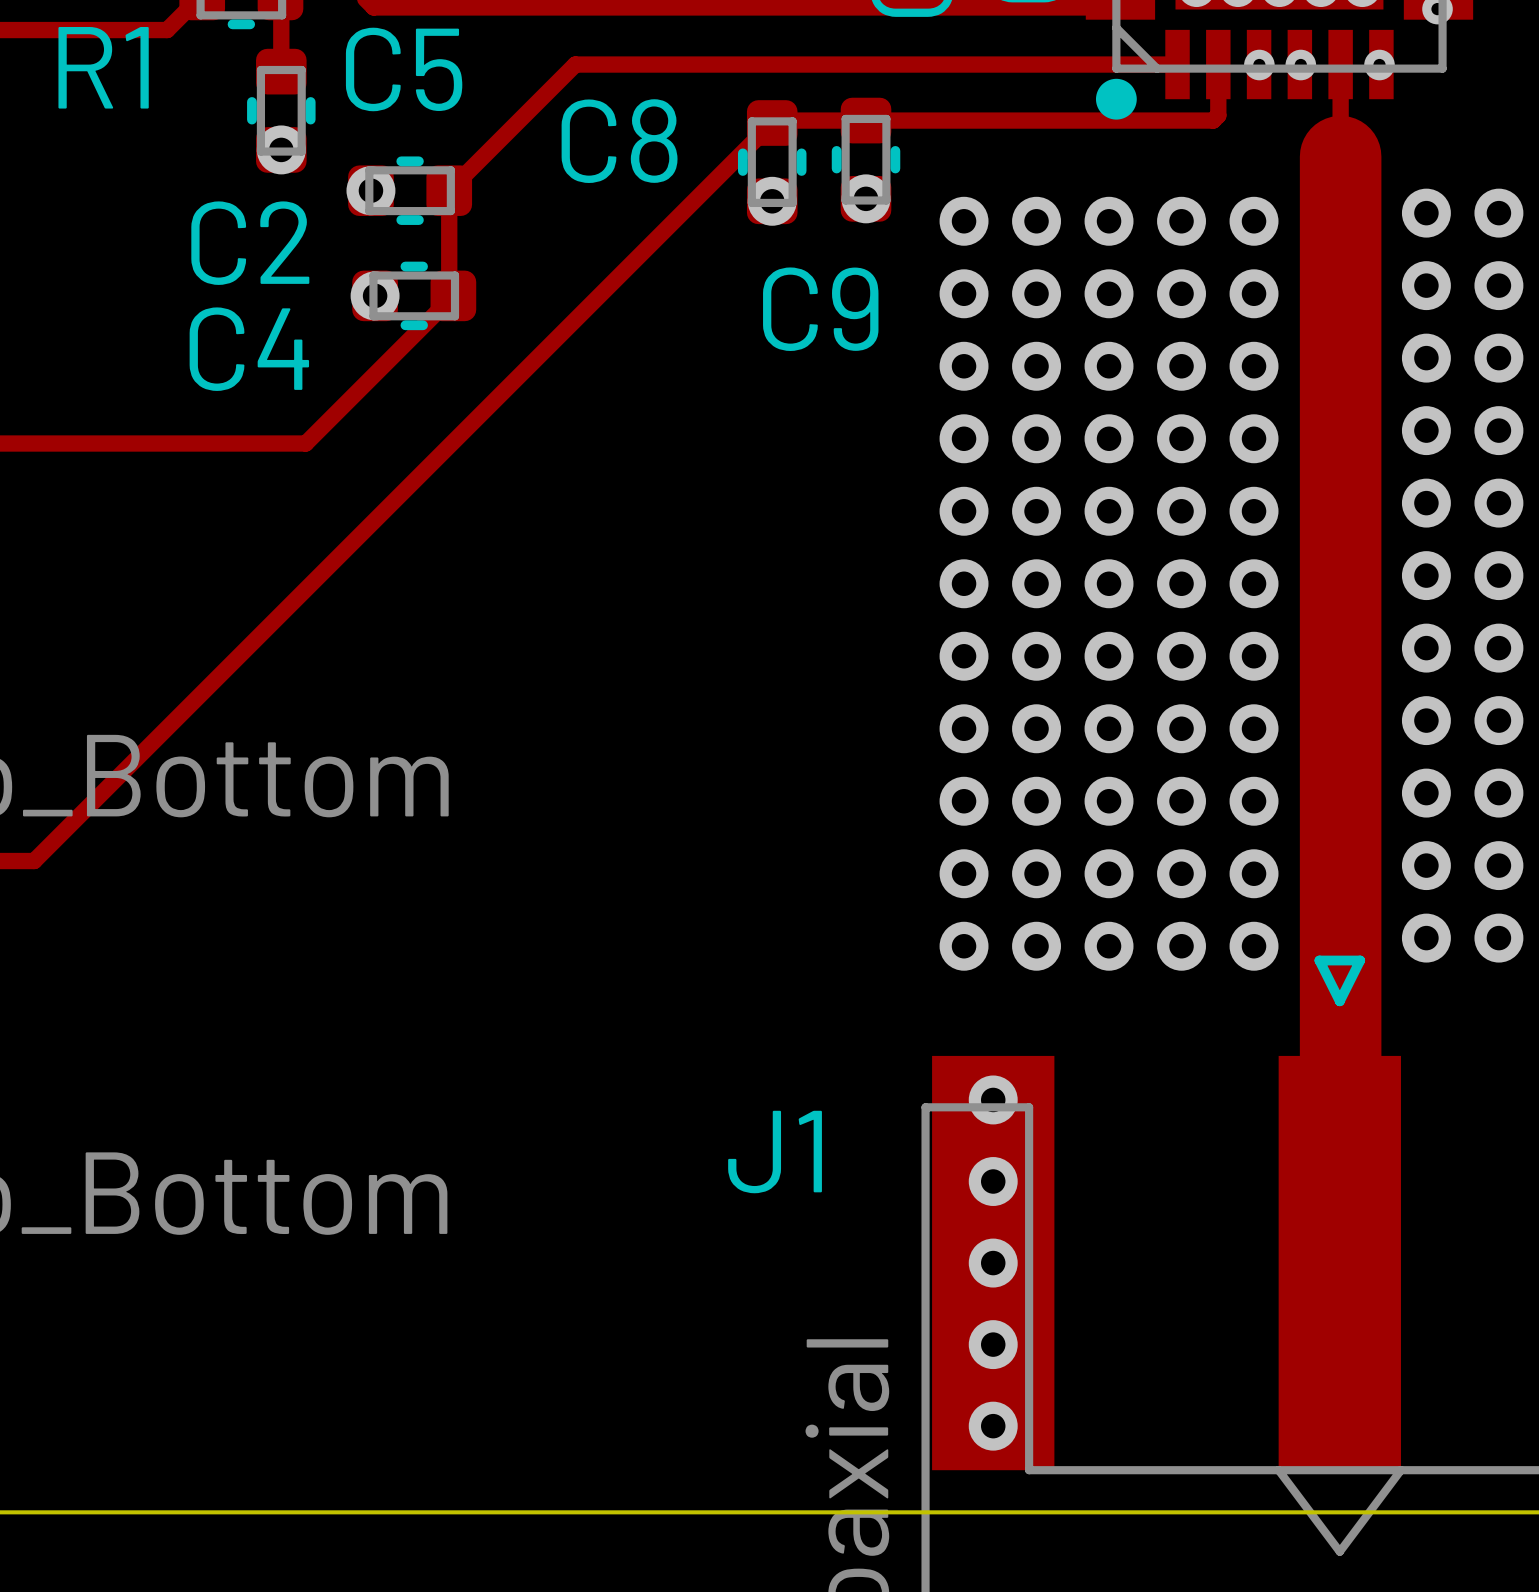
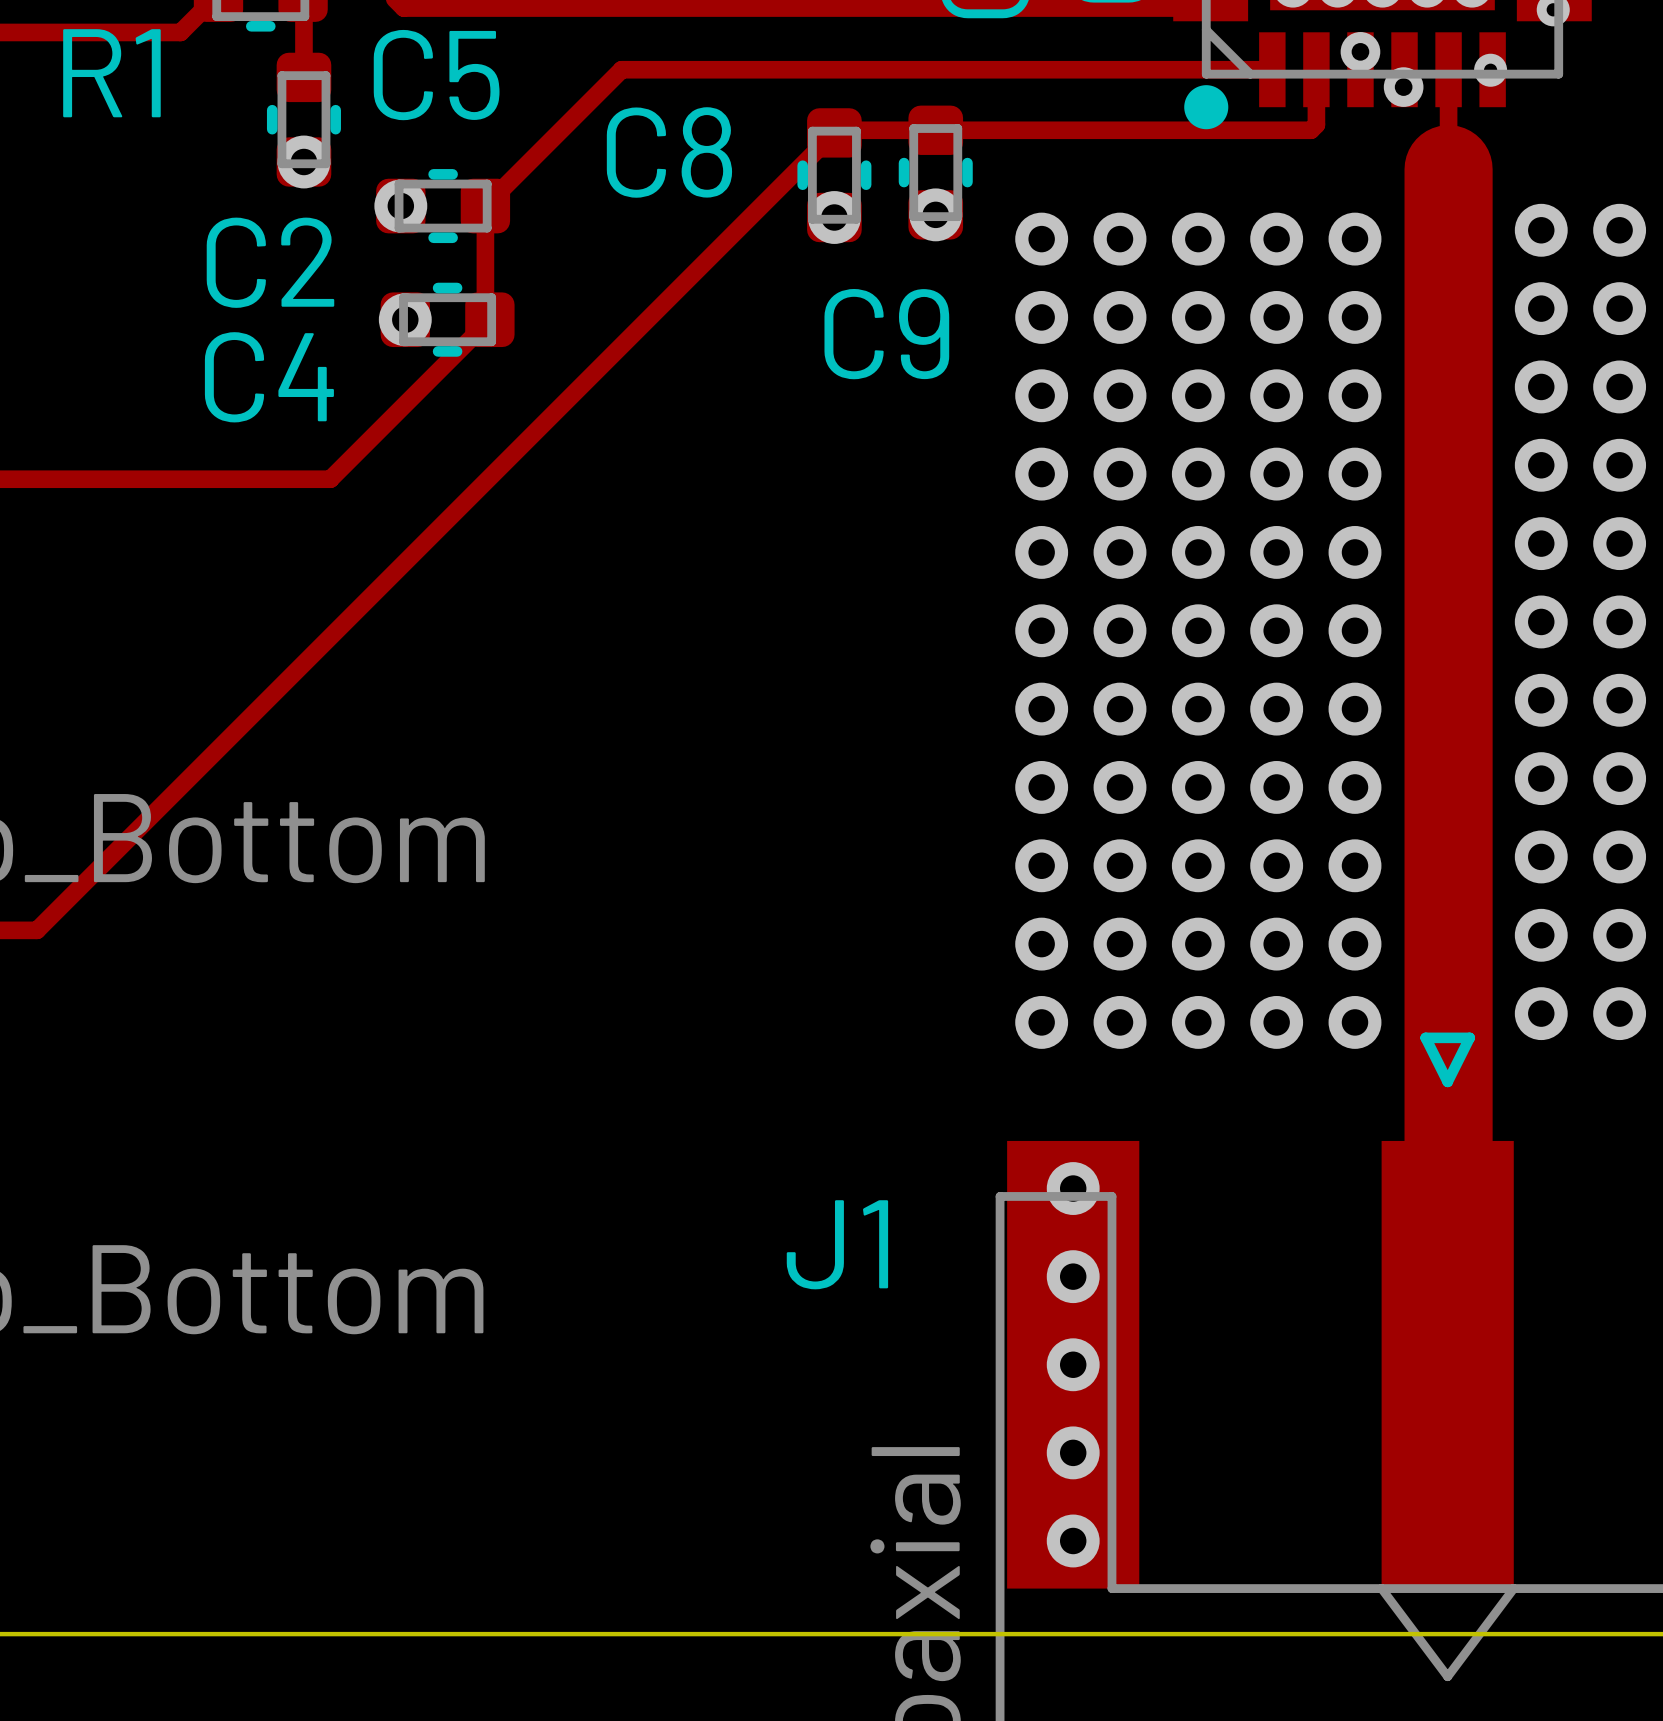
via position: (1259, 65) -> (1360, 51)
via position: (1300, 65) -> (1403, 87)

